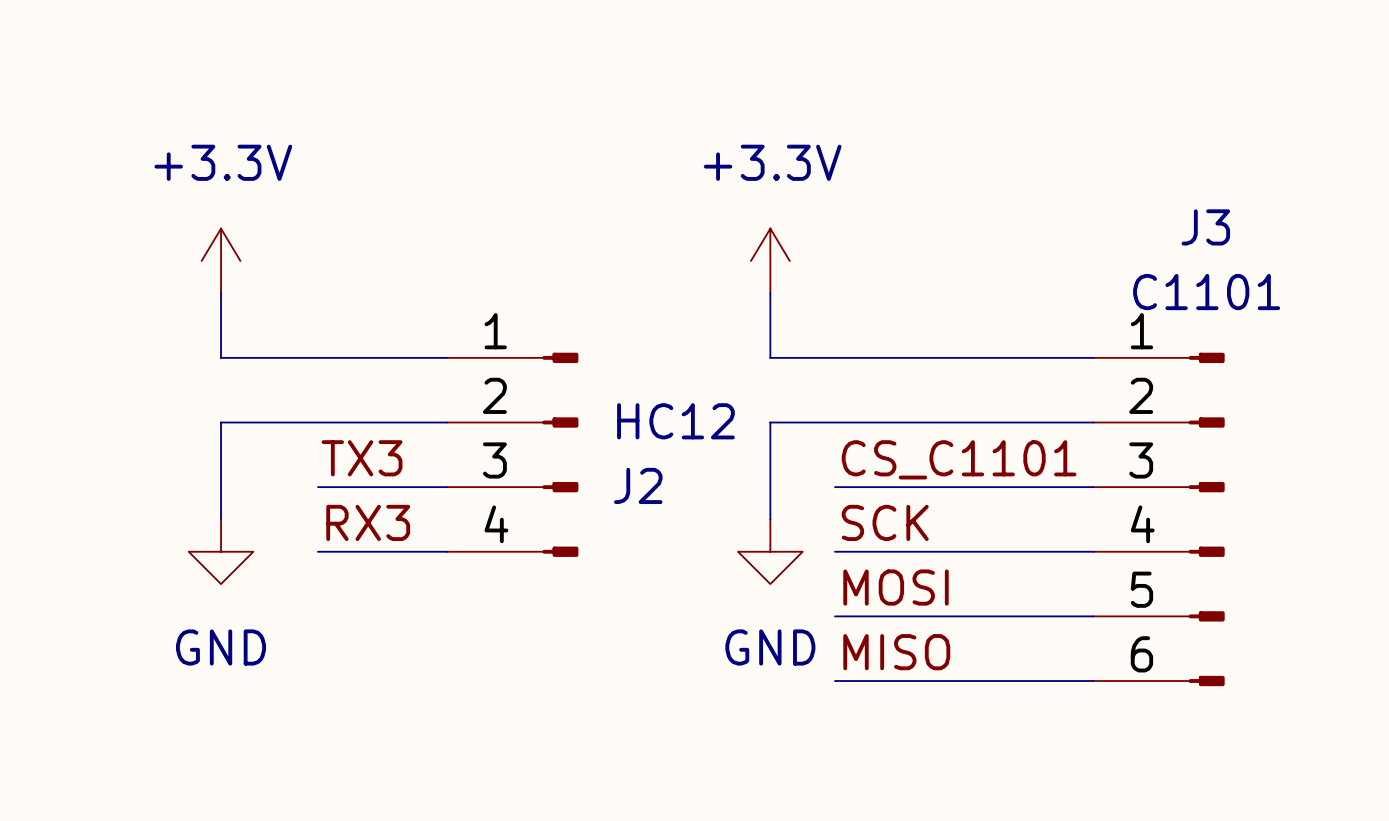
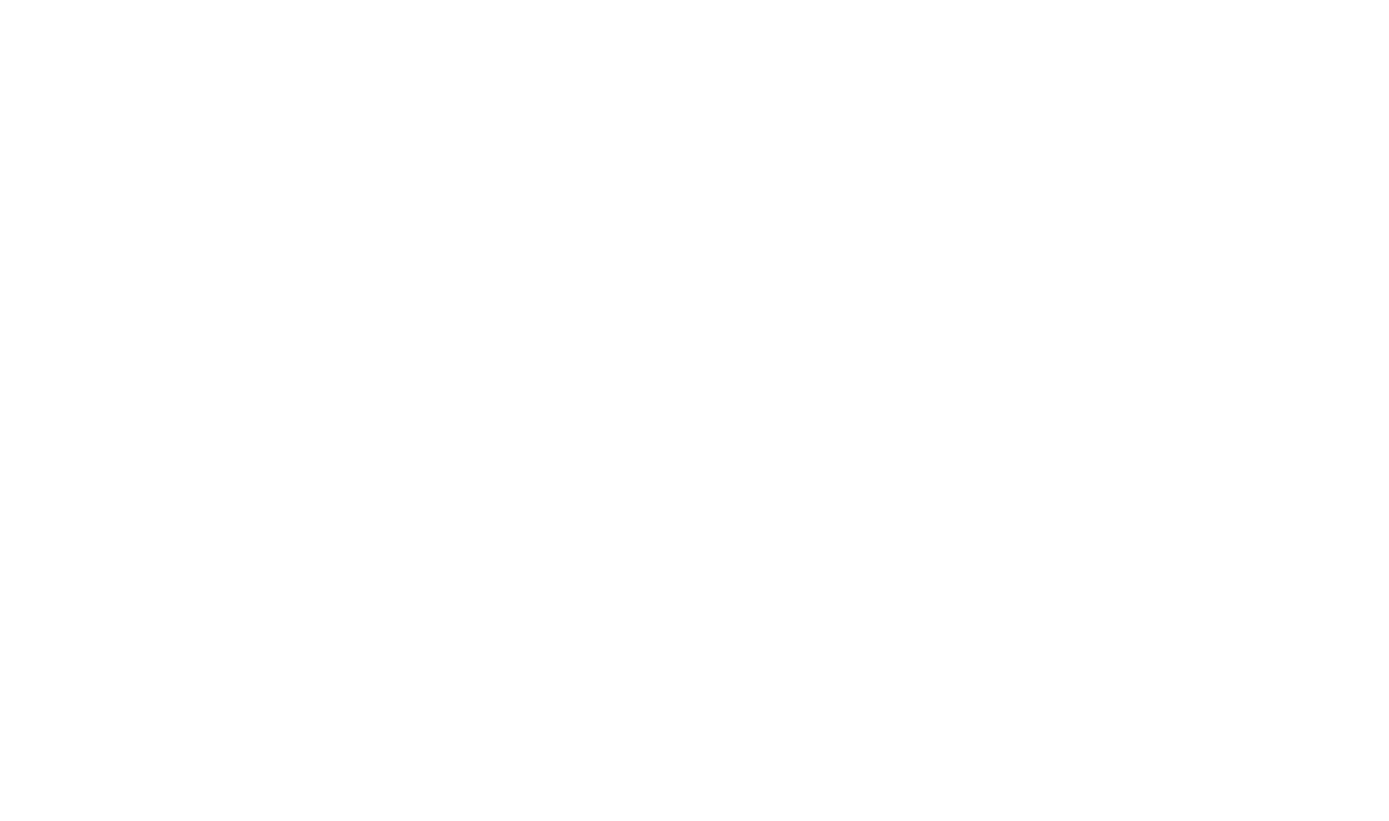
power symbol: +3.3V (221, 260) -> none
power symbol: +3.3V (770, 260) -> none
wire: (221, 293) (221, 357) (447, 357) -> none
wire: (770, 293) (770, 357) (1093, 357) -> none
wire: (447, 422) (221, 422) (221, 519) -> none
wire: (1093, 422) (770, 422) (770, 519) -> none
J2: HC12 (512, 454) -> none
label: TX3 (362, 458) -> none
label: CS_C1101 (959, 459) -> none
wire: (317, 487) (447, 487) -> none
wire: (834, 487) (1093, 487) -> none
J3: C1101 (1159, 519) -> none
label: RX3 (368, 522) -> none
label: SCK (885, 522) -> none
power symbol: GND (221, 551) -> none
wire: (317, 551) (447, 551) -> none
power symbol: GND (770, 551) -> none
wire: (834, 551) (1093, 551) -> none
label: MOSI (896, 587) -> none
wire: (834, 616) (1093, 616) -> none
label: MISO (896, 652) -> none
wire: (834, 681) (1093, 681) -> none

